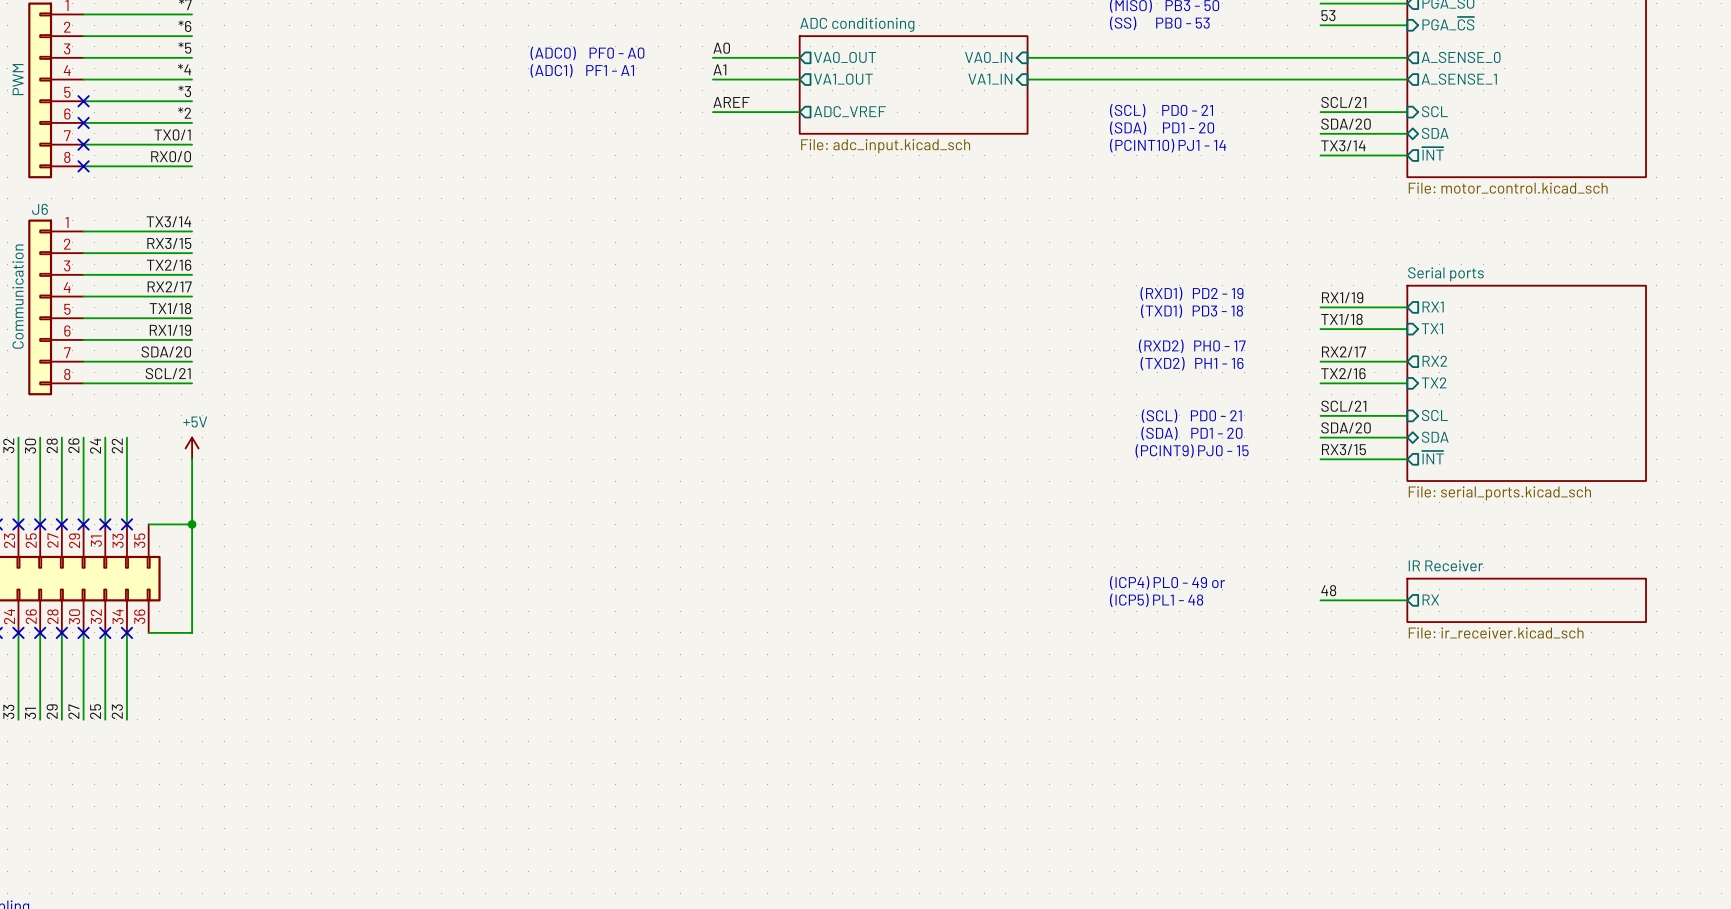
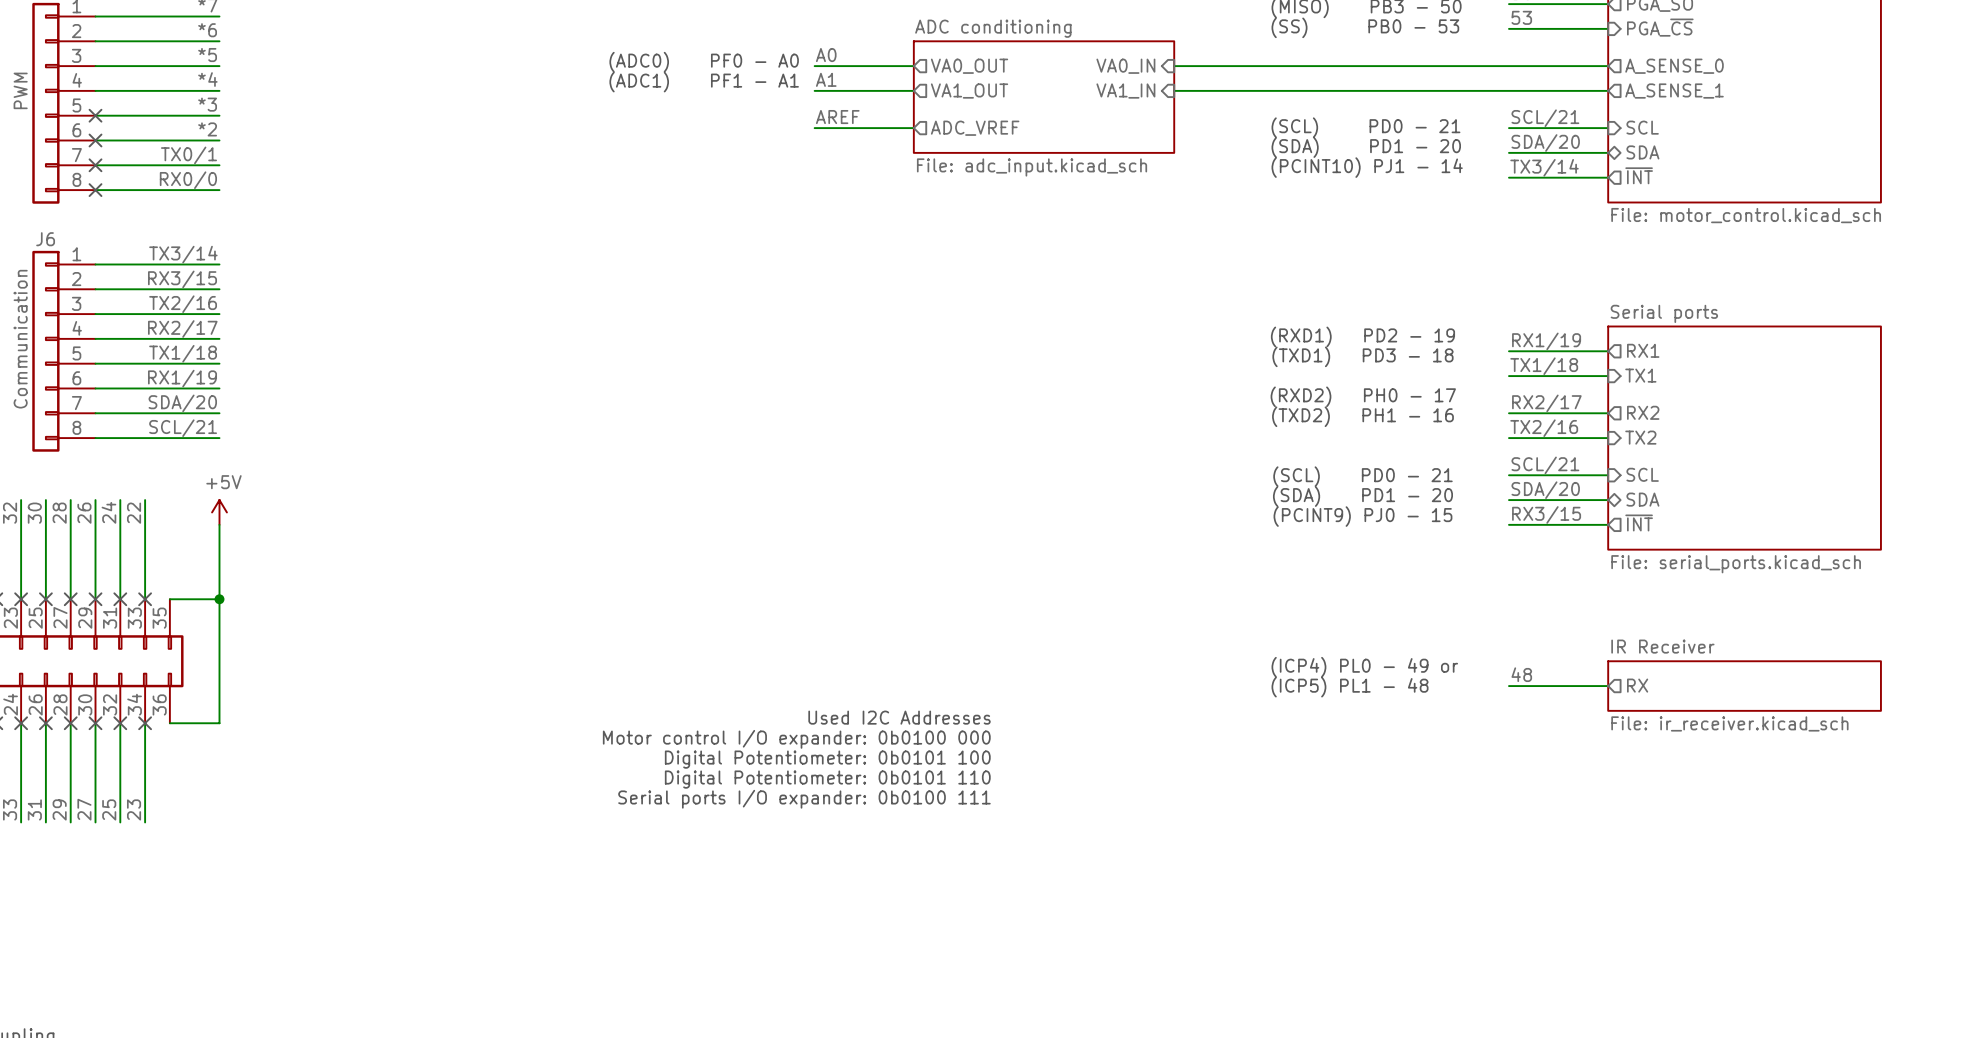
text: none -> Used I2C Addresses (899, 717)
text: none -> Motor control I/O expander: 0b0100 000 (796, 739)
text: none -> Digital Potentiometer: 0b0101 100 (827, 759)
text: none -> Digital Potentiometer: 0b0101 110 (827, 779)
text: none -> Serial ports I/O expander: 0b0100 111 (804, 799)

